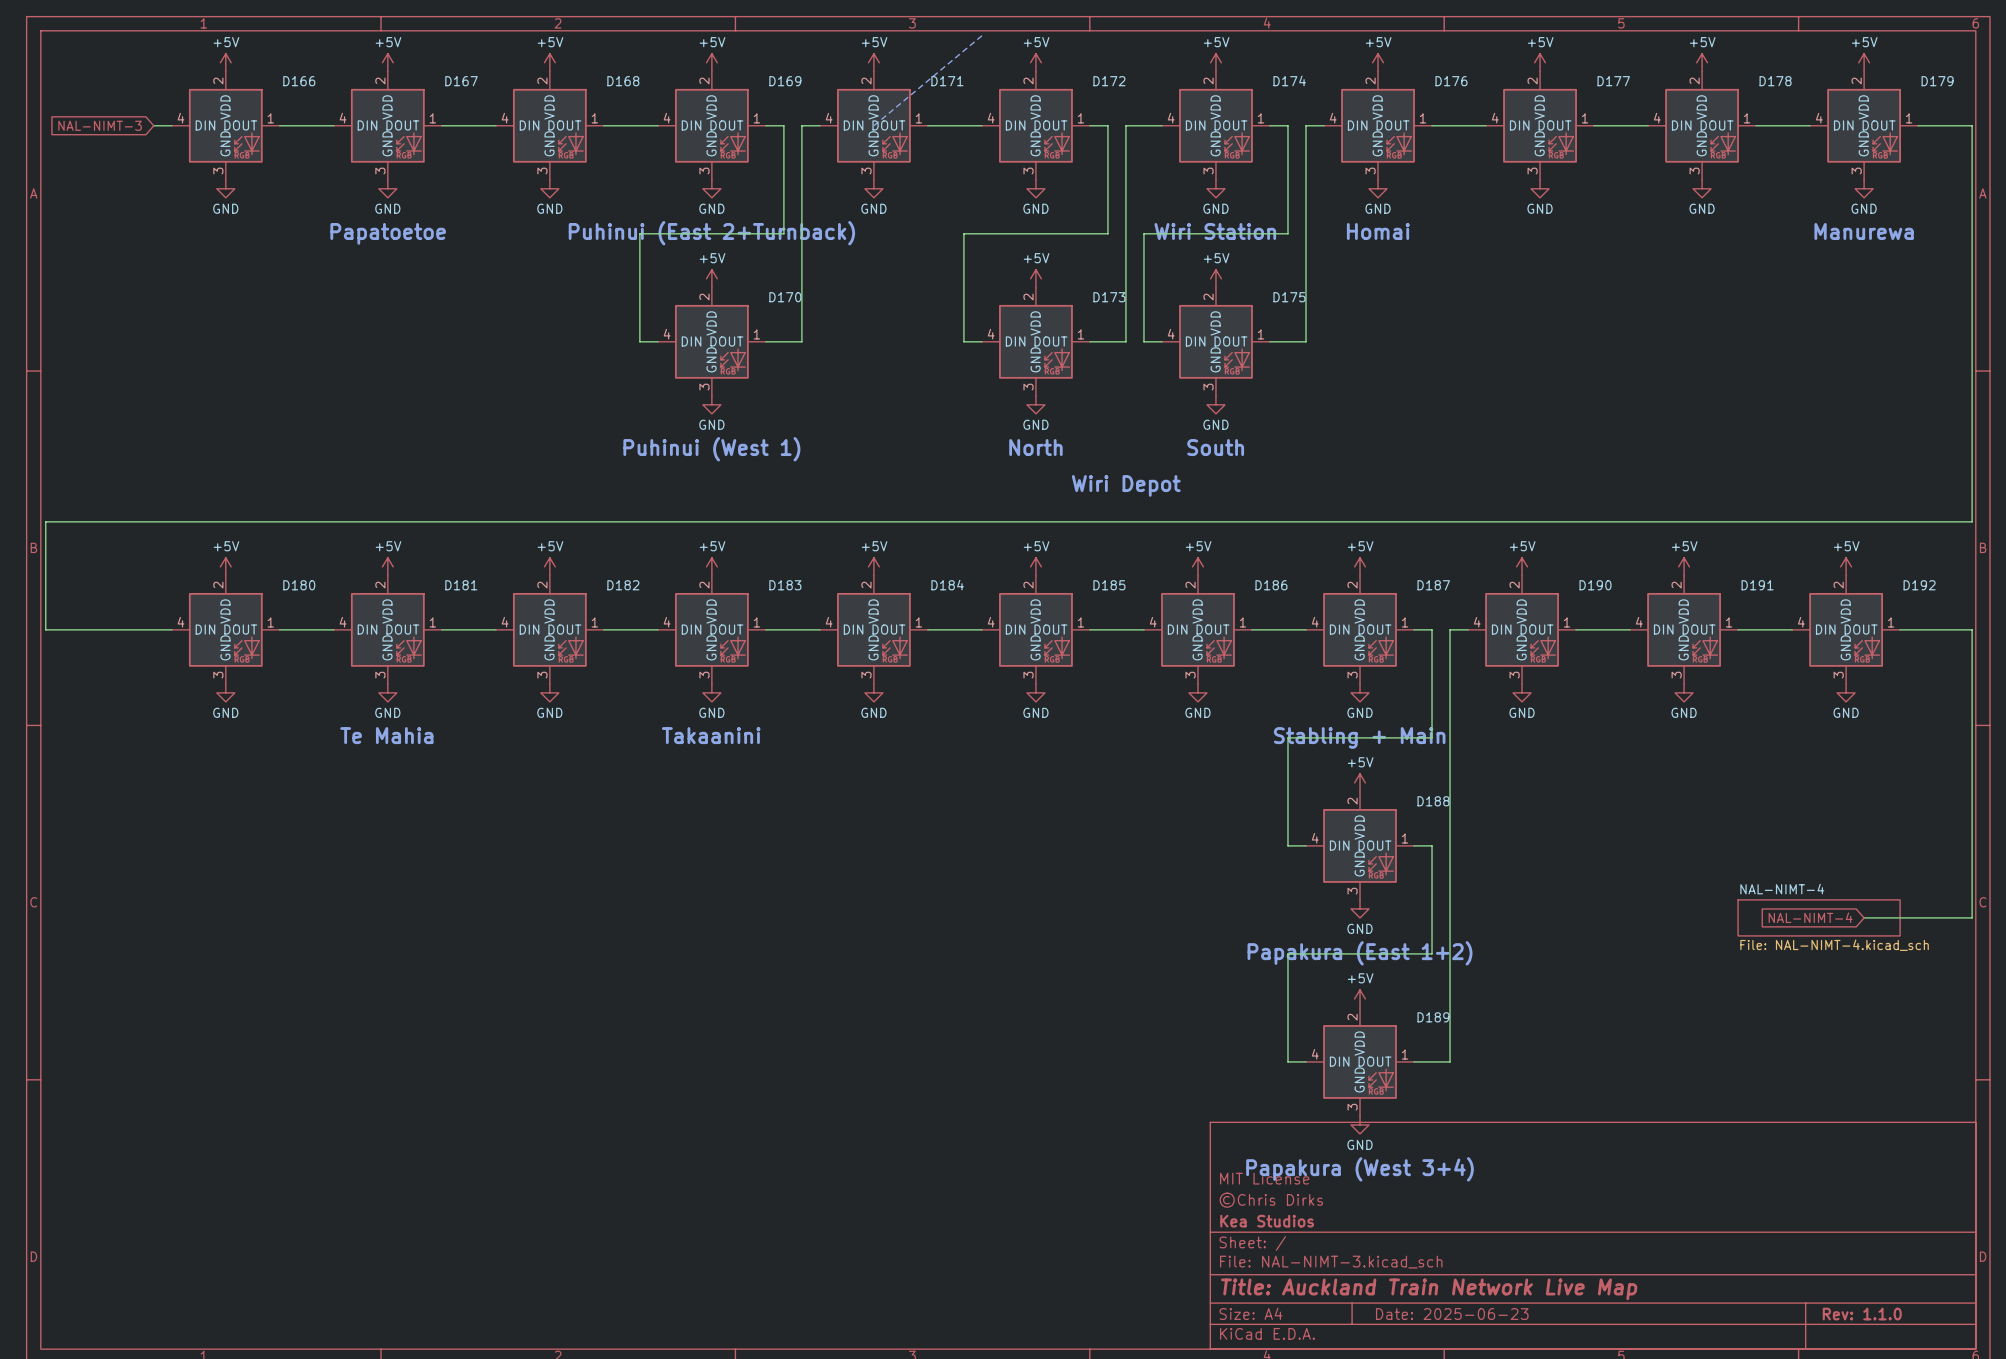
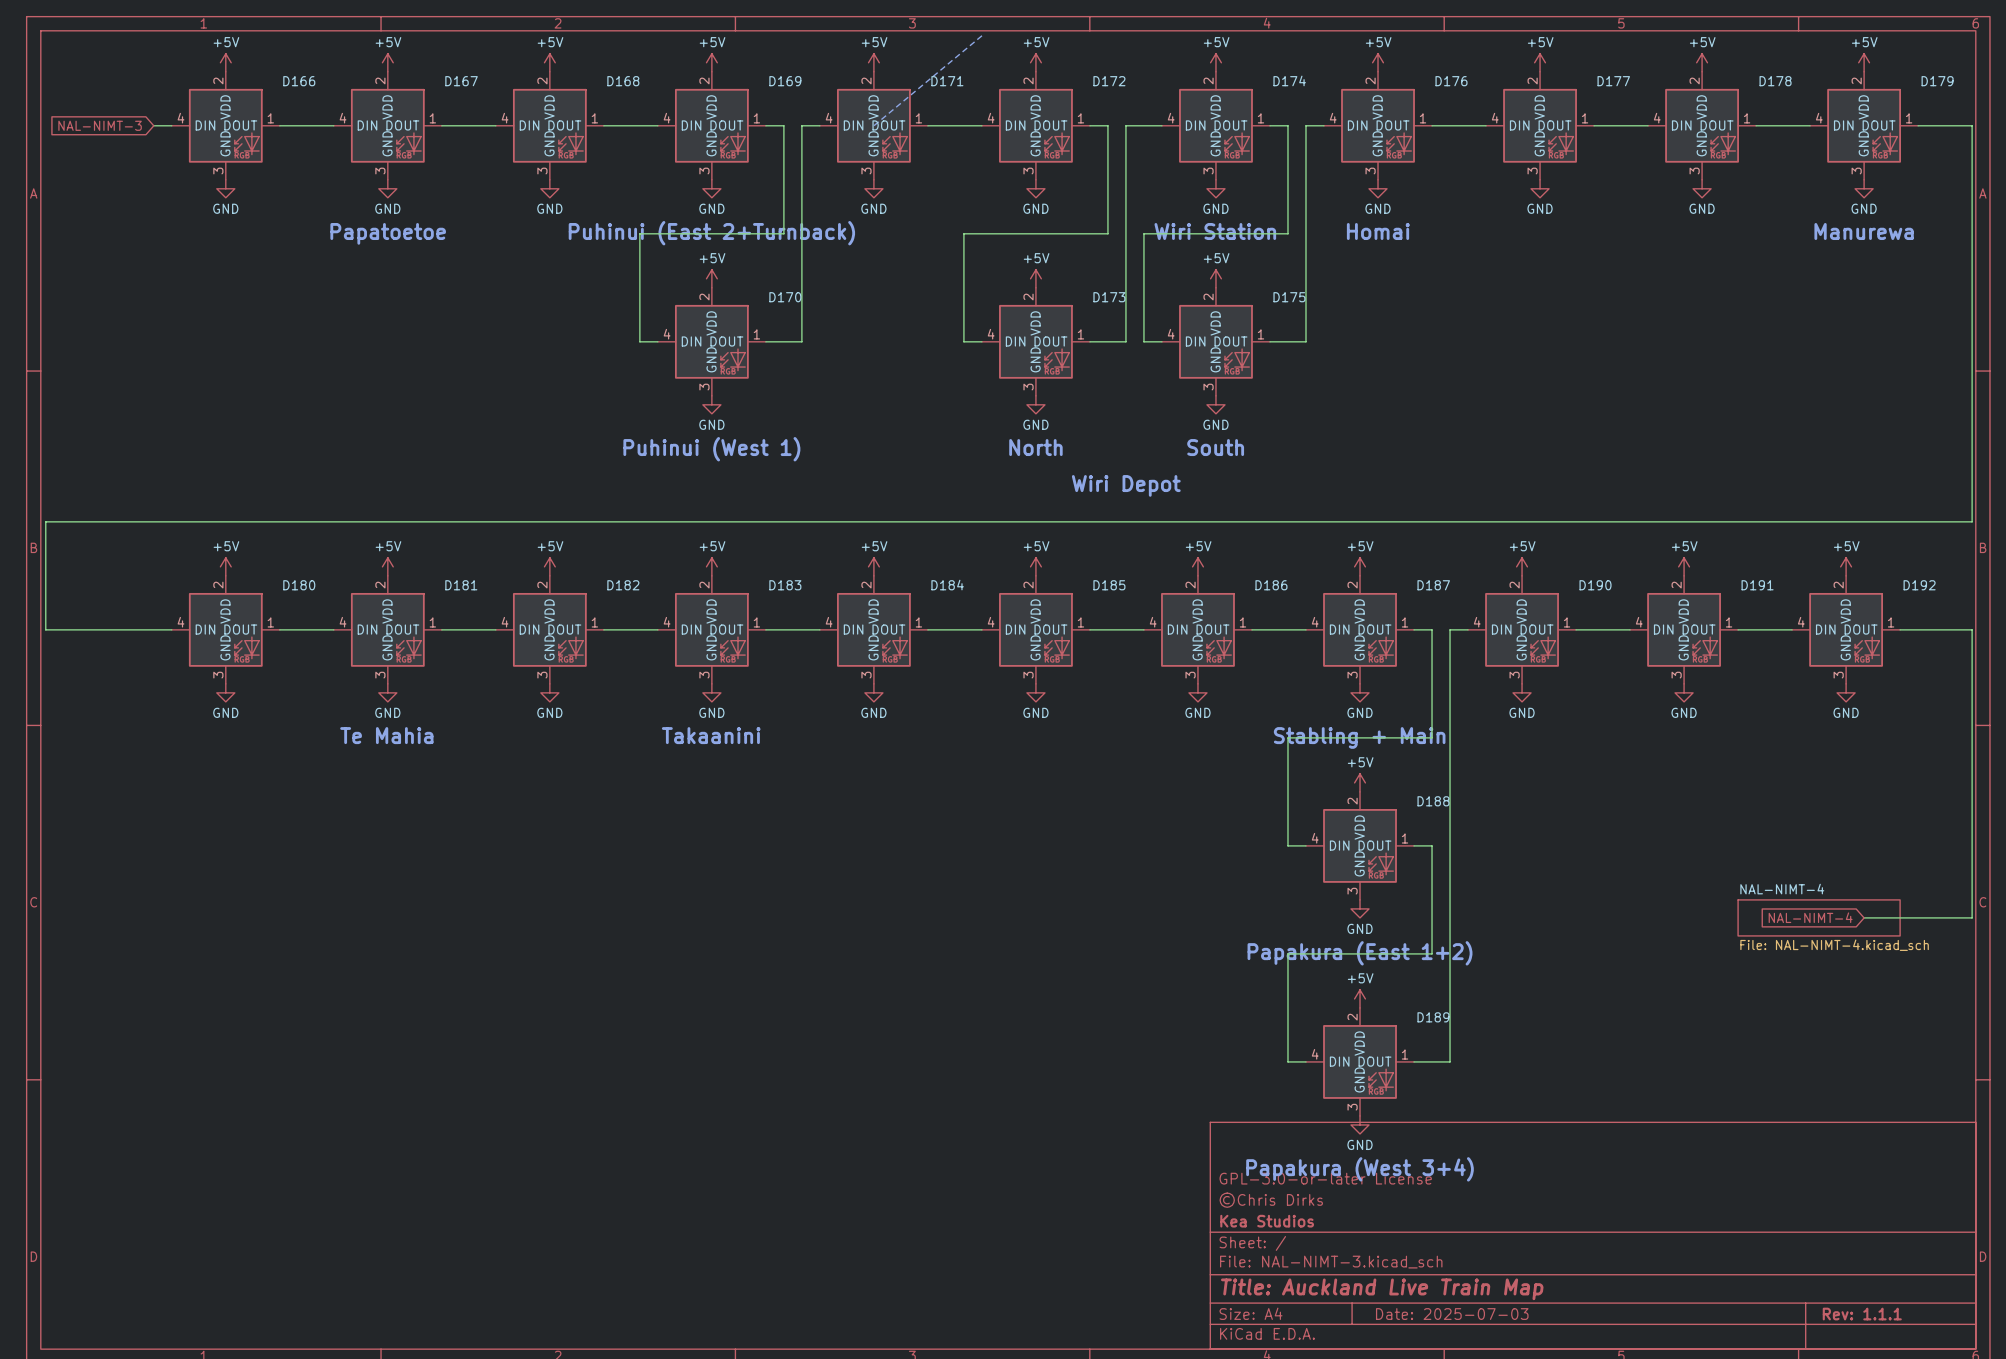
title block: MIT License (1264, 1178) -> GPL-3.0-or-later License (1325, 1178)
title block: Title: Auckland Train Network Live Map (1429, 1289) -> Title: Auckland Live Train Map (1382, 1289)
title block: Date: 2025-06-23 (1452, 1314) -> Date: 2025-07-03 (1452, 1314)
title block: Rev: 1.1.0 (1862, 1314) -> Rev: 1.1.1 (1862, 1314)

